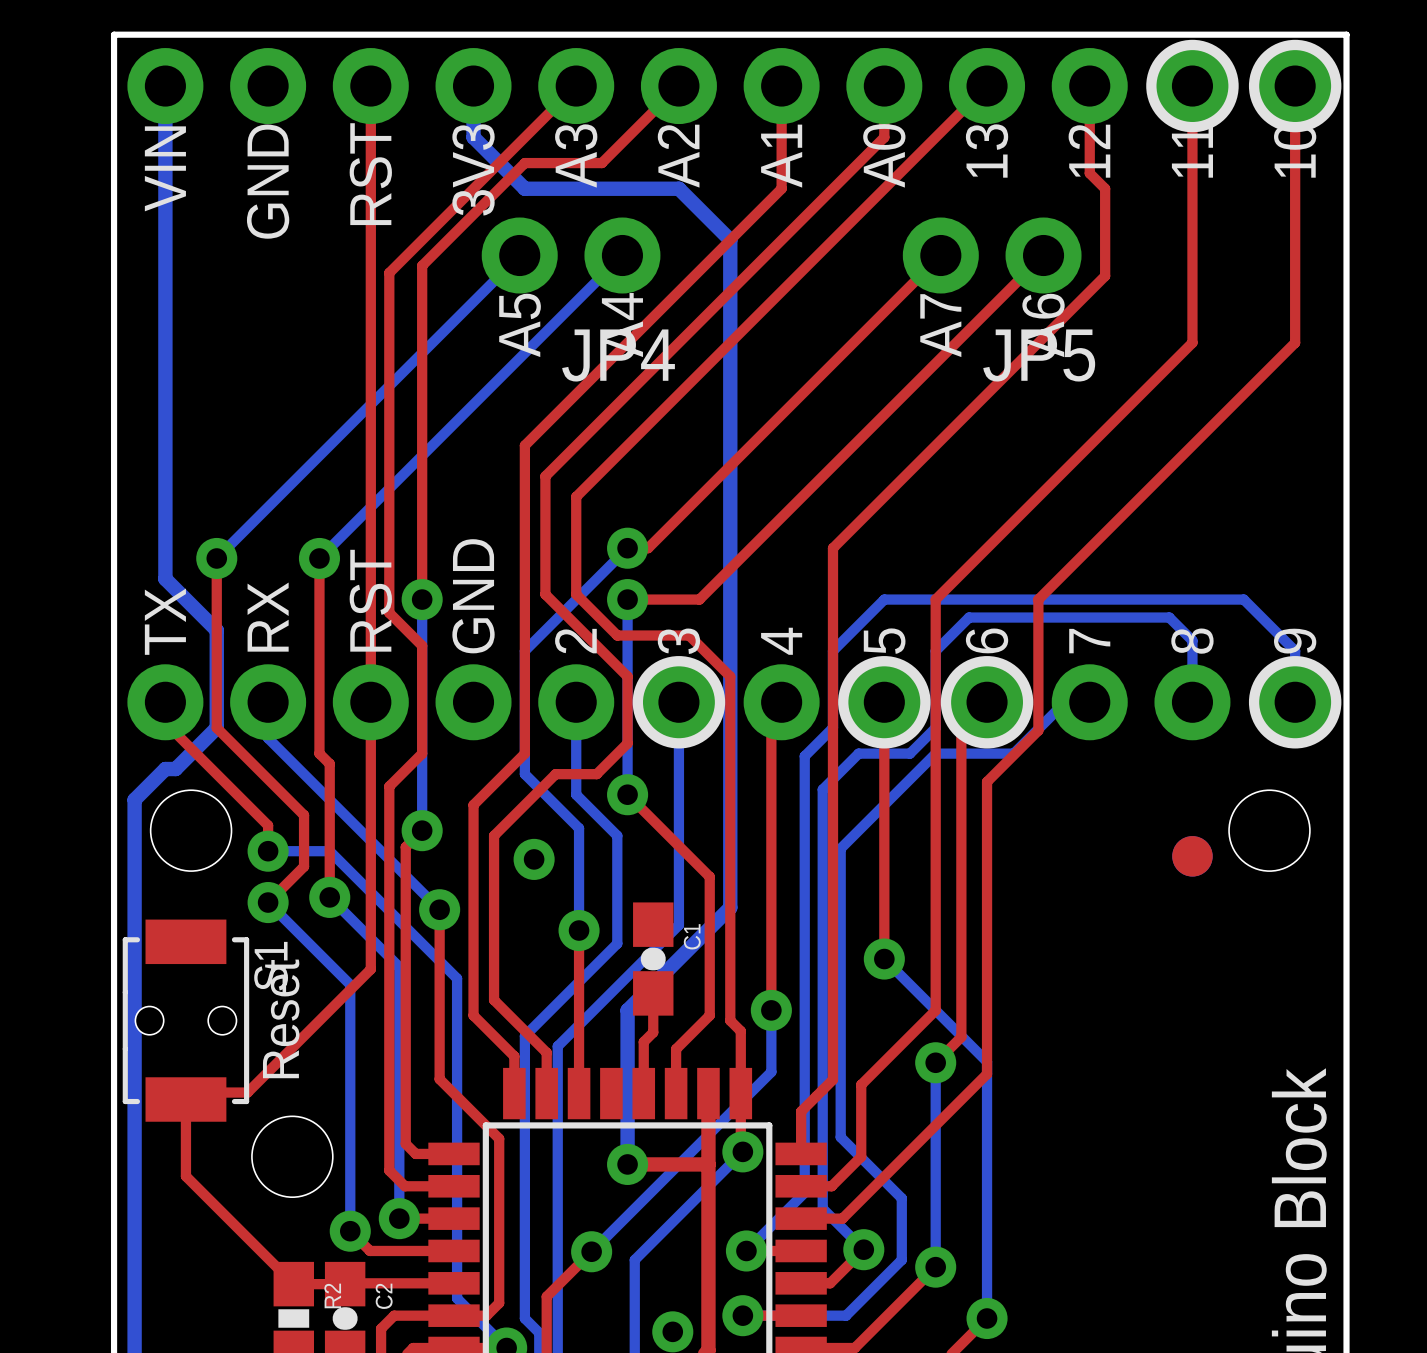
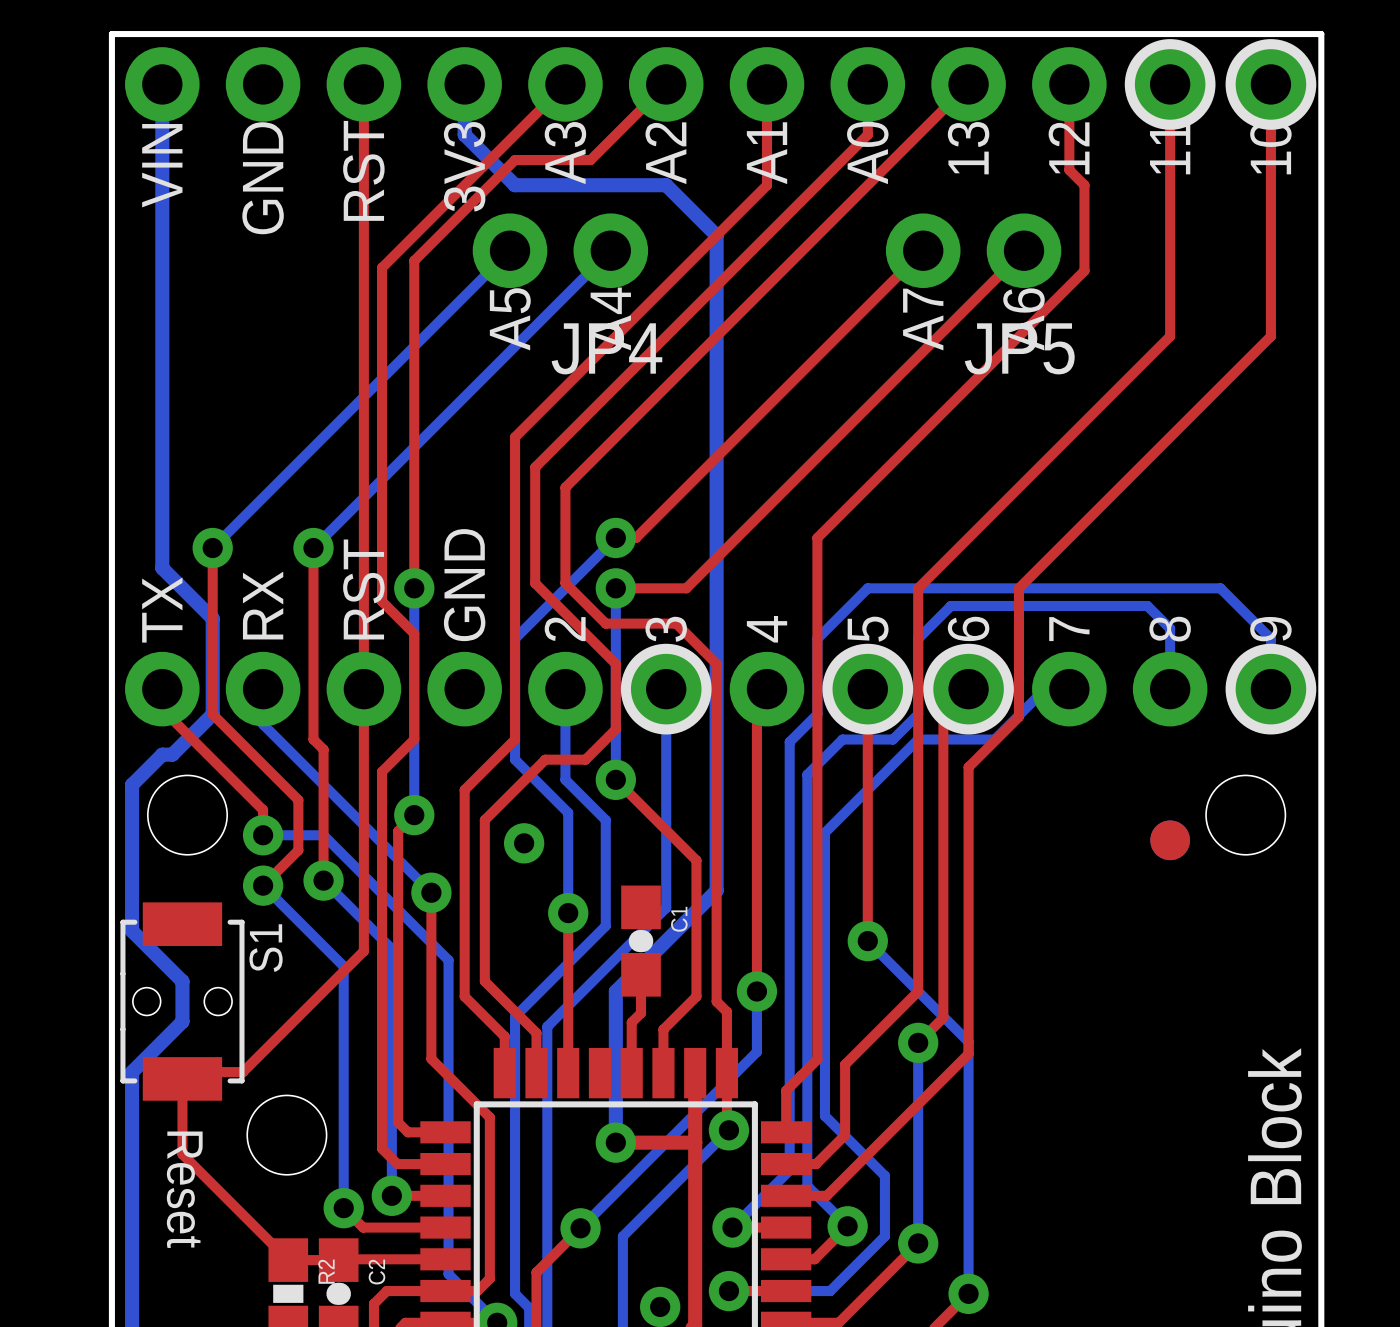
bottom track: (134, 948) (134, 1092) -> (132, 931) (182, 981) (182, 1021) (132, 1072)
text rotation: 0° (281, 1018) -> 180° (184, 1189)
text position: Reset (281, 1018) -> Reset (184, 1189)

